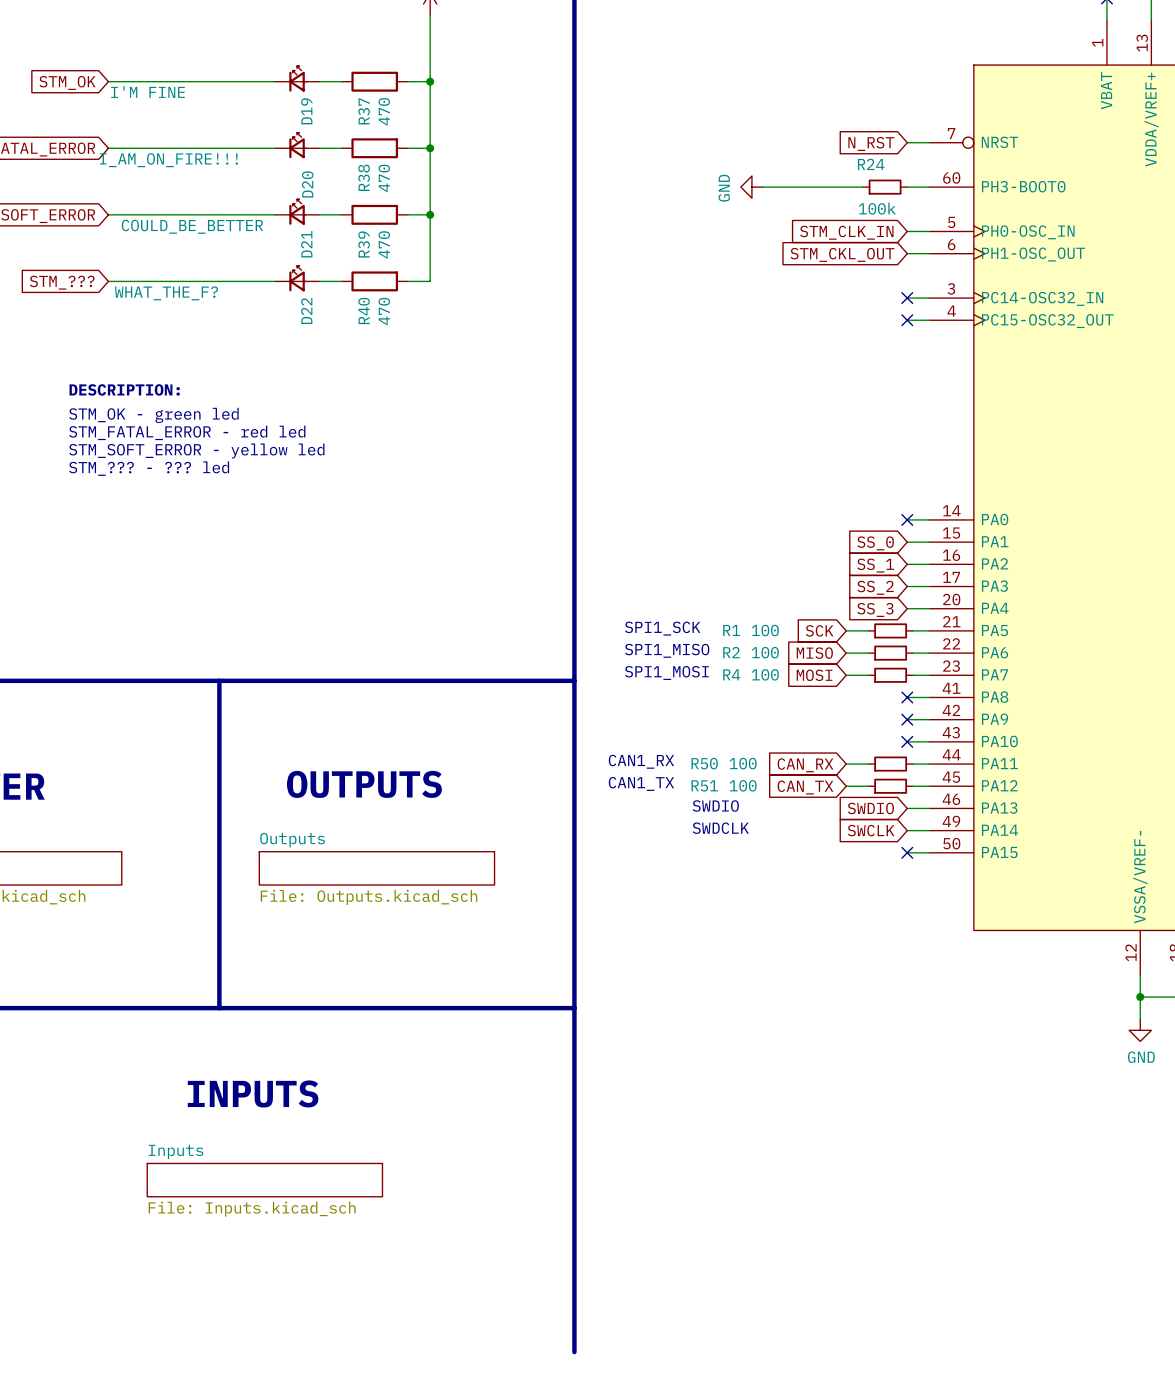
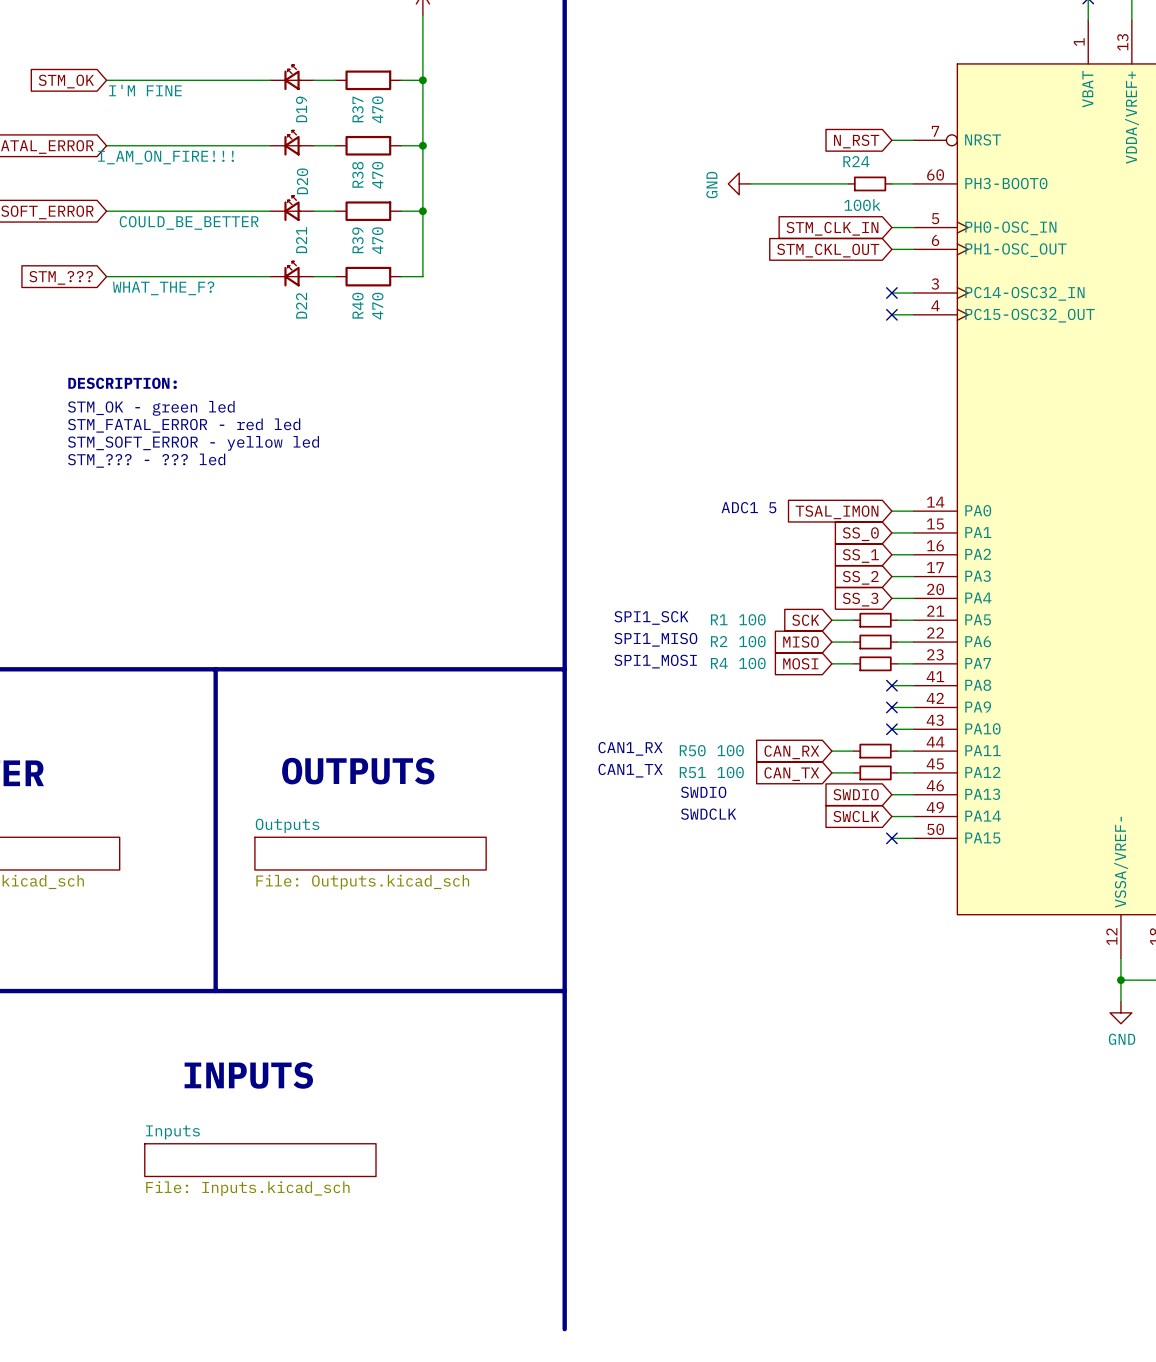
text: none -> ADC1 5 (748, 507)
no-connect mark: (907, 519) -> none
global label: none -> TSAL_IMON (837, 512)

